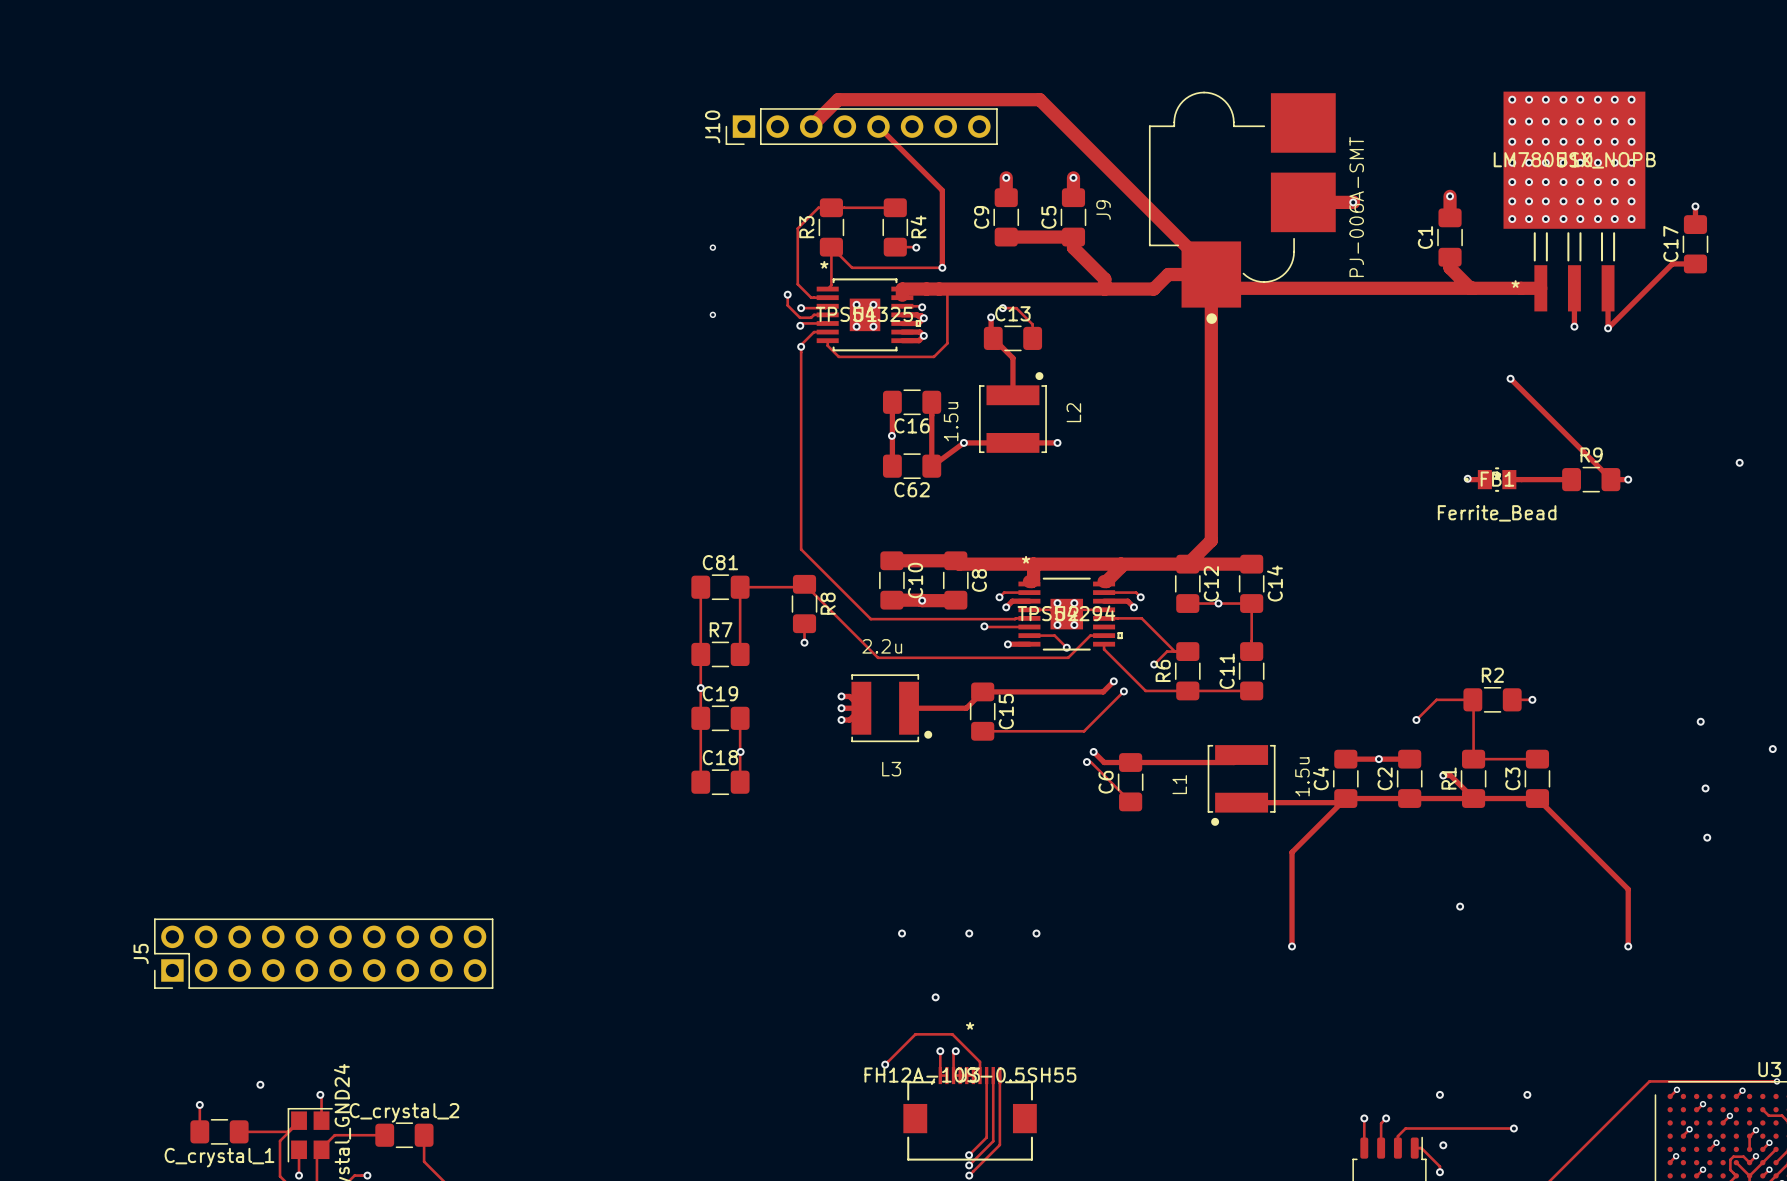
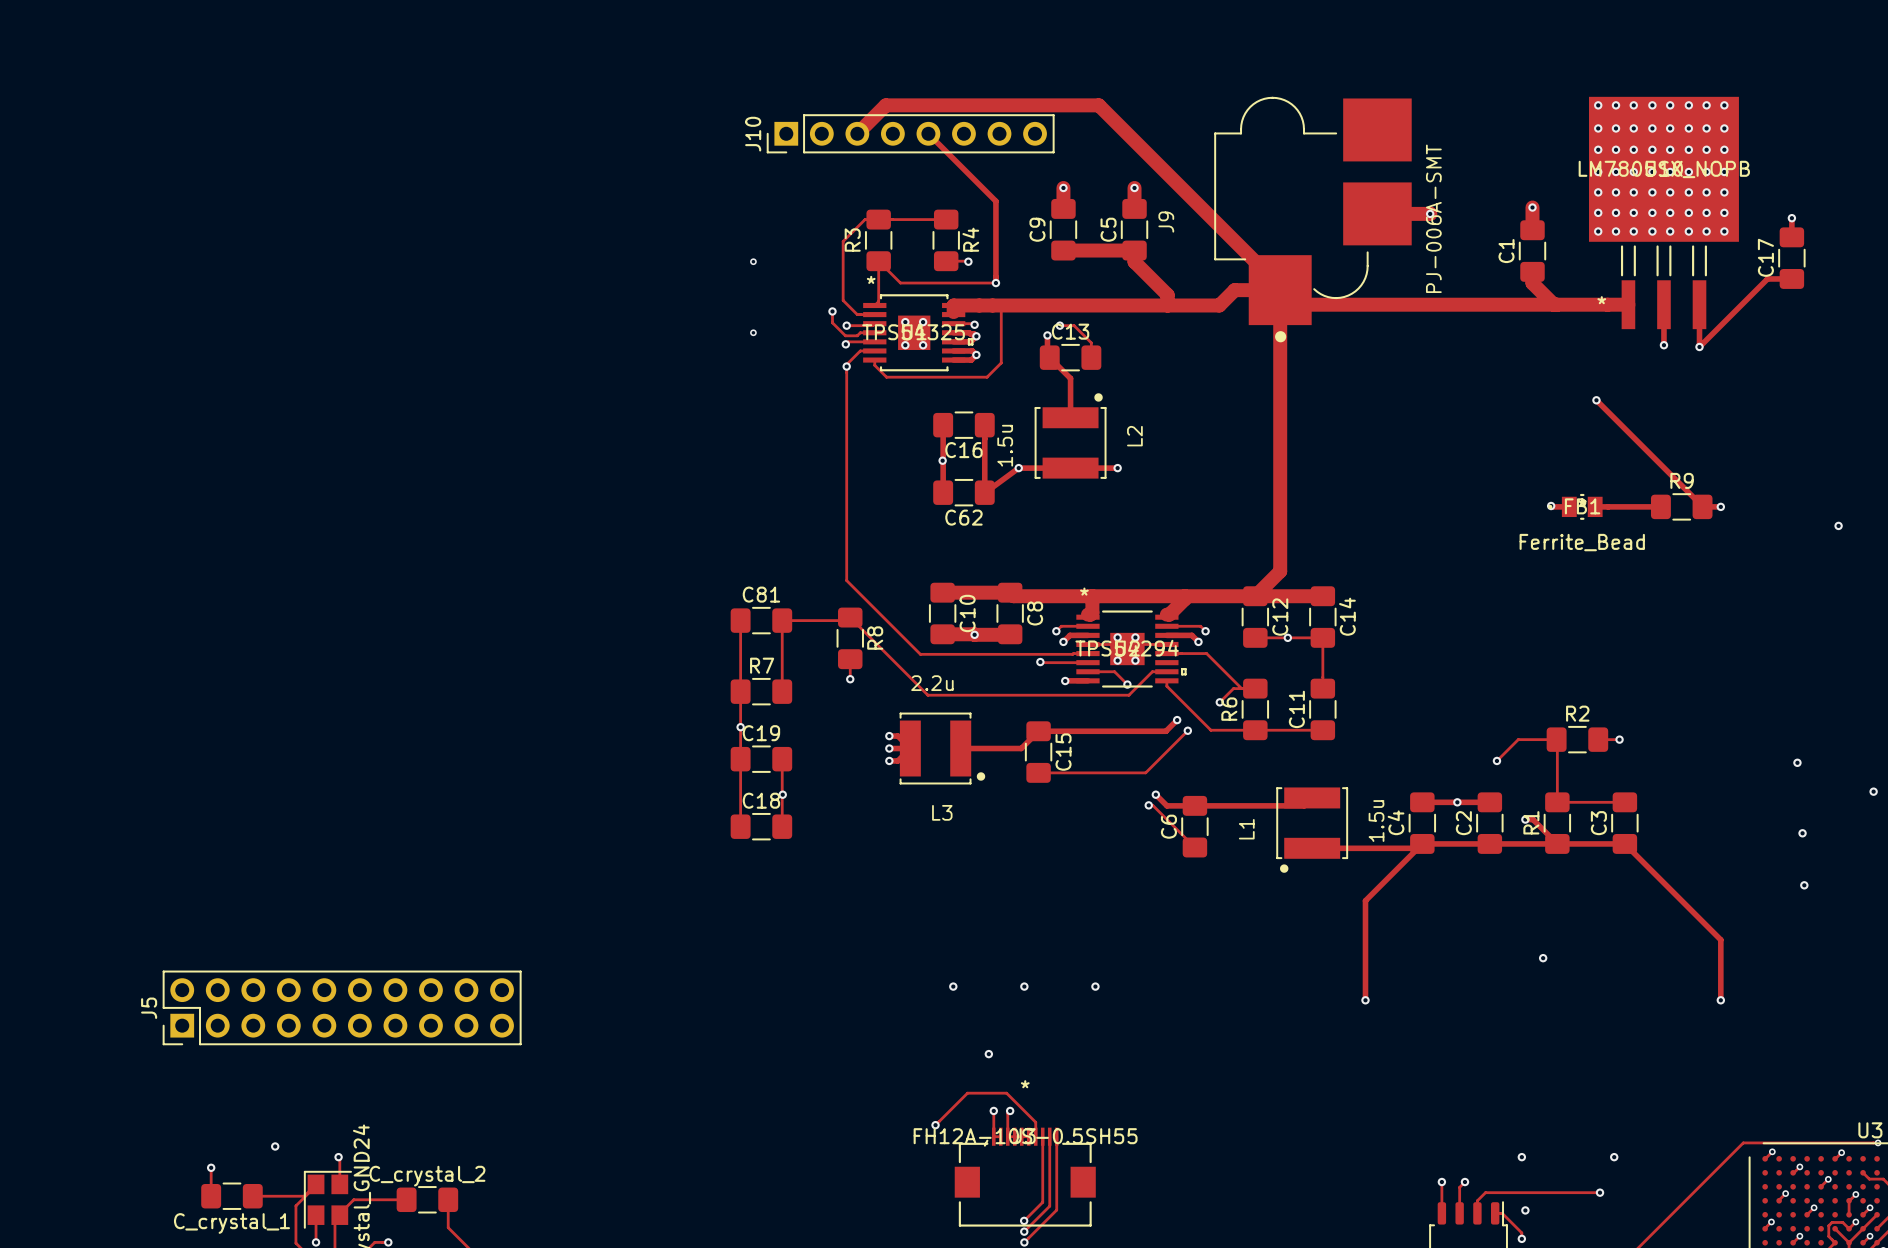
via position: (1739, 462) -> (1838, 525)

